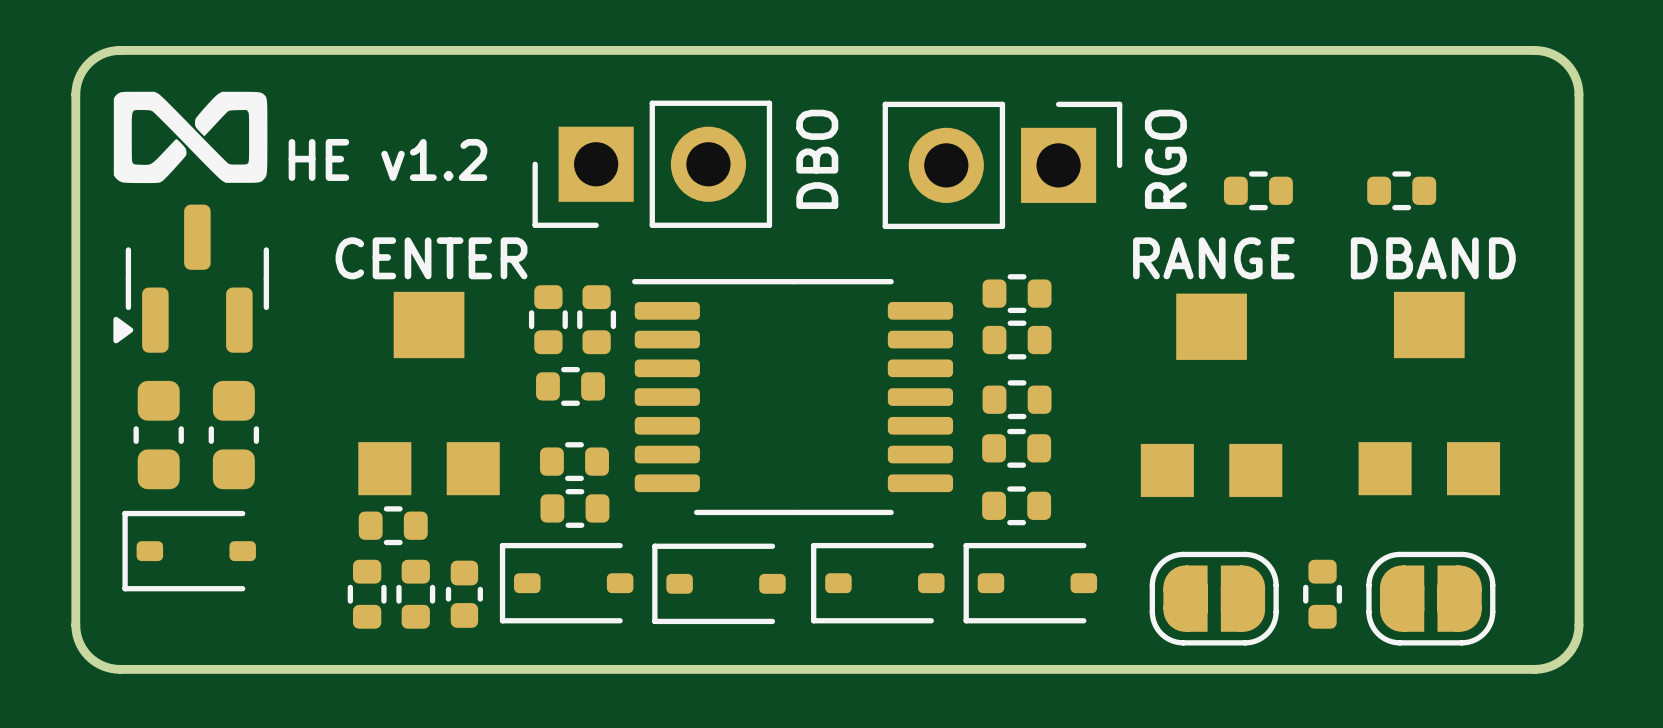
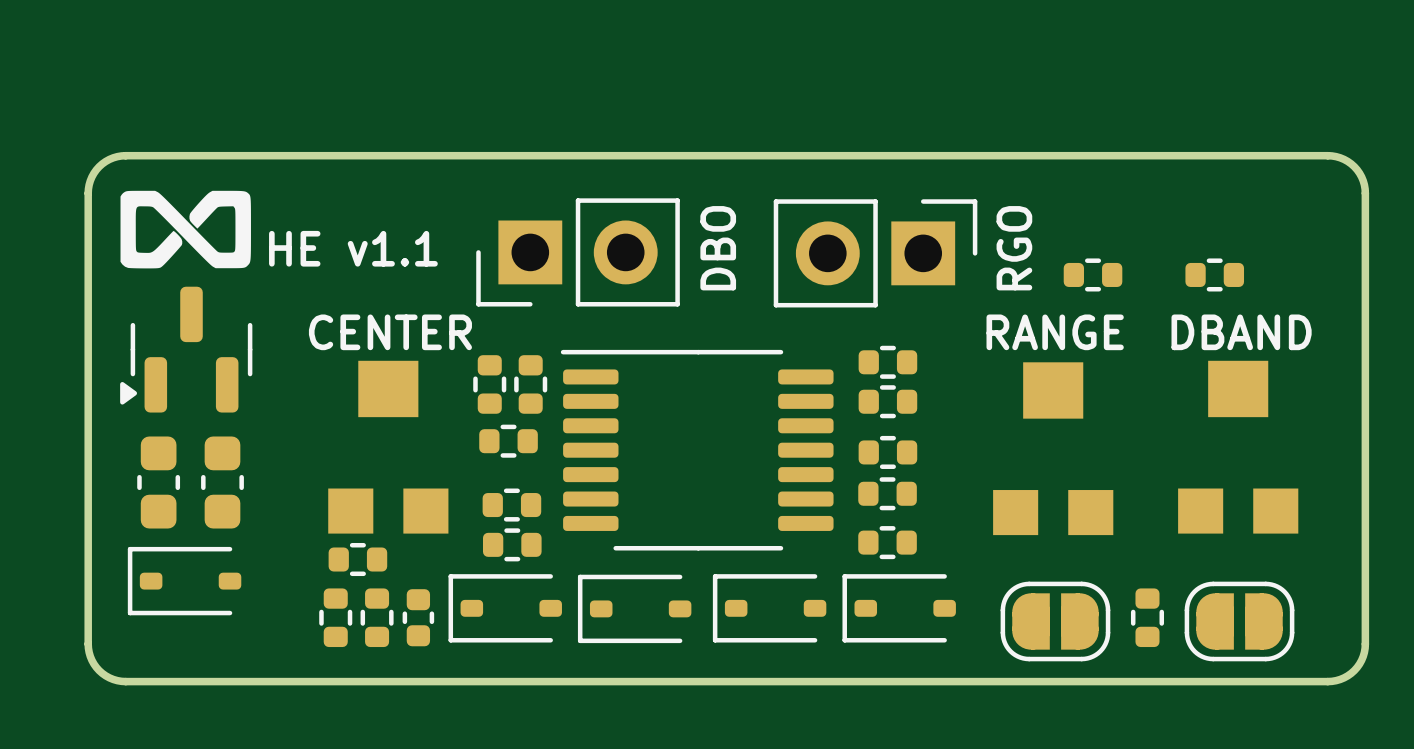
text: HE v1.2 (387, 159) -> HE v1.1 (353, 248)

